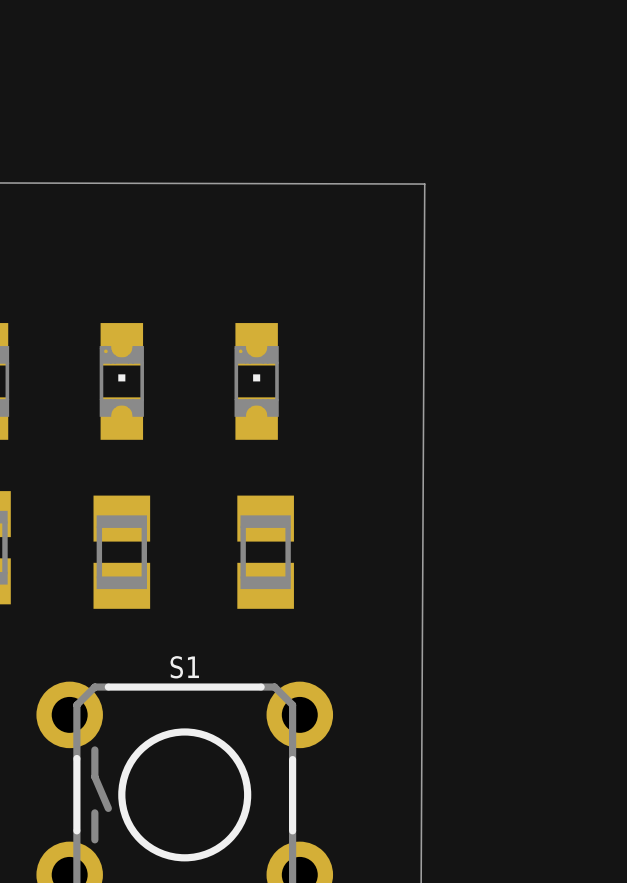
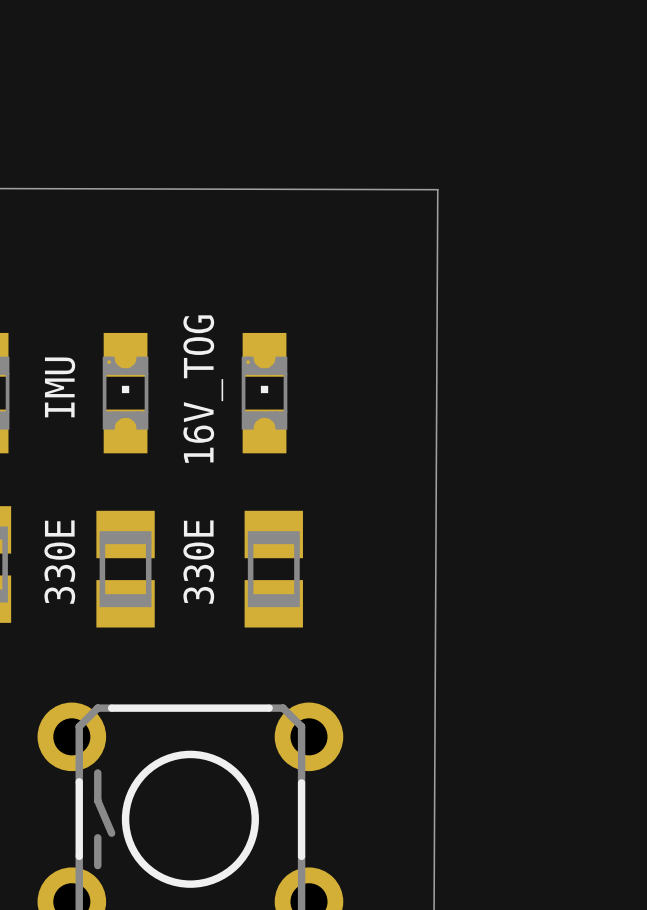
text: none -> IMU (60, 387)
text: none -> 16V_TOG (203, 389)
text: none -> 330E (59, 562)
text: none -> 330E (198, 562)
S1 name: S1 (184, 667) -> none

